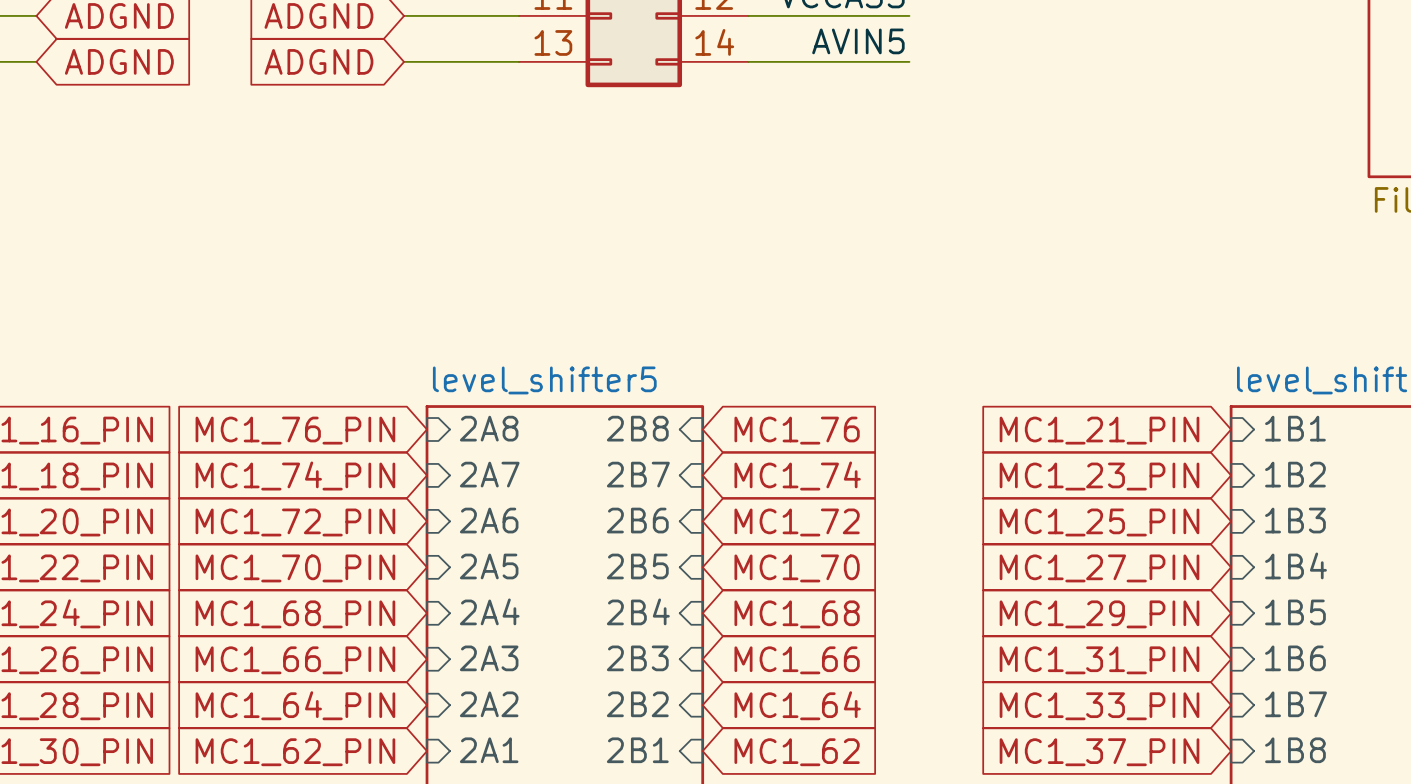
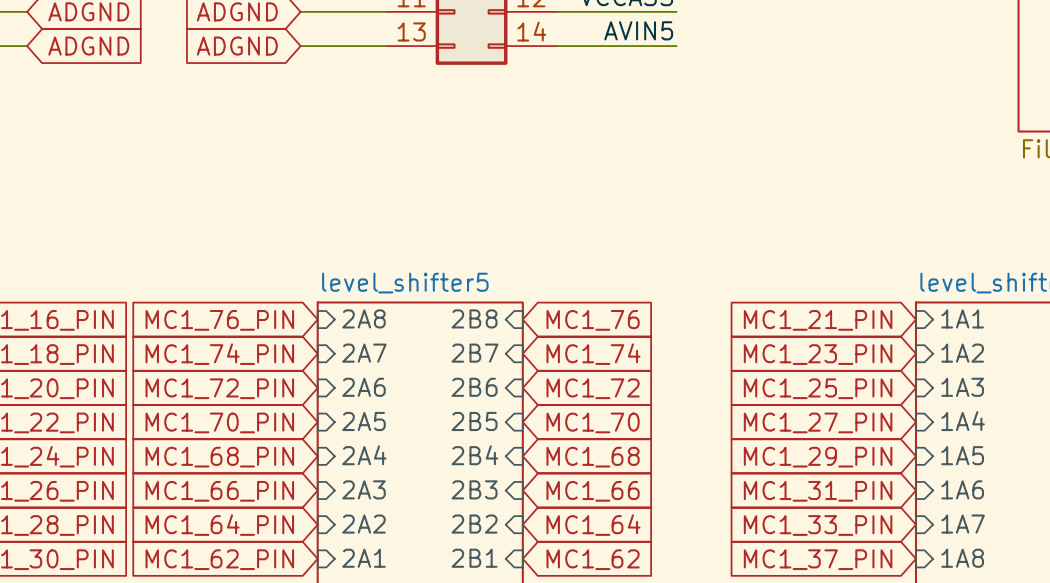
sheet pin: 1B1 (1295, 428) -> 1A1 (962, 318)
sheet pin: 1B2 (1295, 474) -> 1A2 (962, 353)
sheet pin: 1B3 (1295, 520) -> 1A3 (962, 387)
sheet pin: 1B4 (1296, 565) -> 1A4 (963, 421)
sheet pin: 1B5 (1295, 612) -> 1A5 (962, 455)
sheet pin: 1B6 (1295, 658) -> 1A6 (962, 489)
sheet pin: 1B7 (1296, 704) -> 1A7 (963, 524)
sheet pin: 1B8 (1295, 750) -> 1A8 (962, 558)

